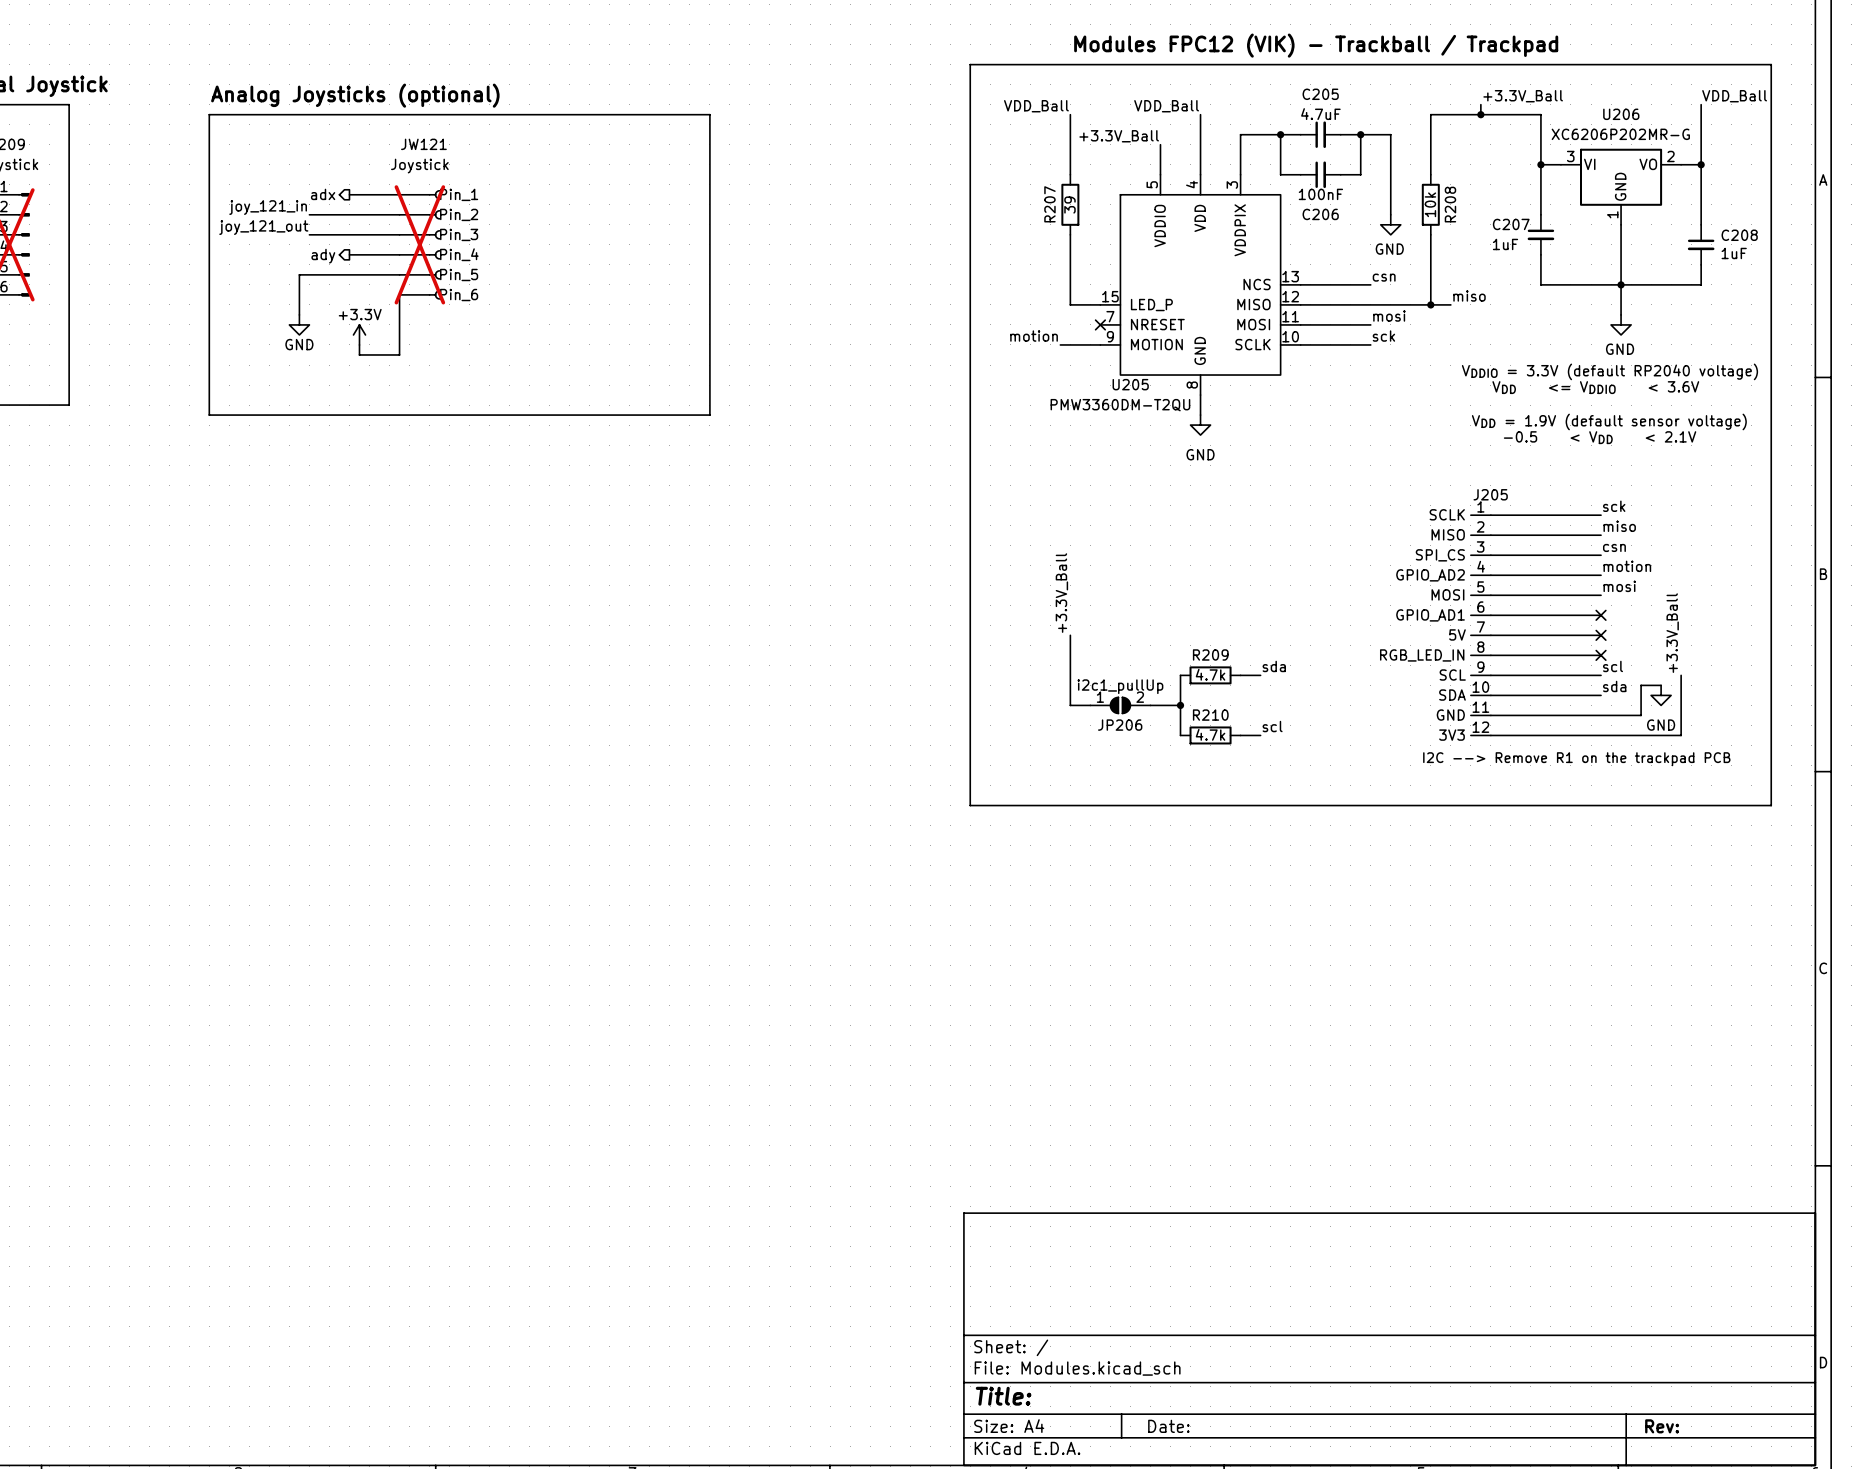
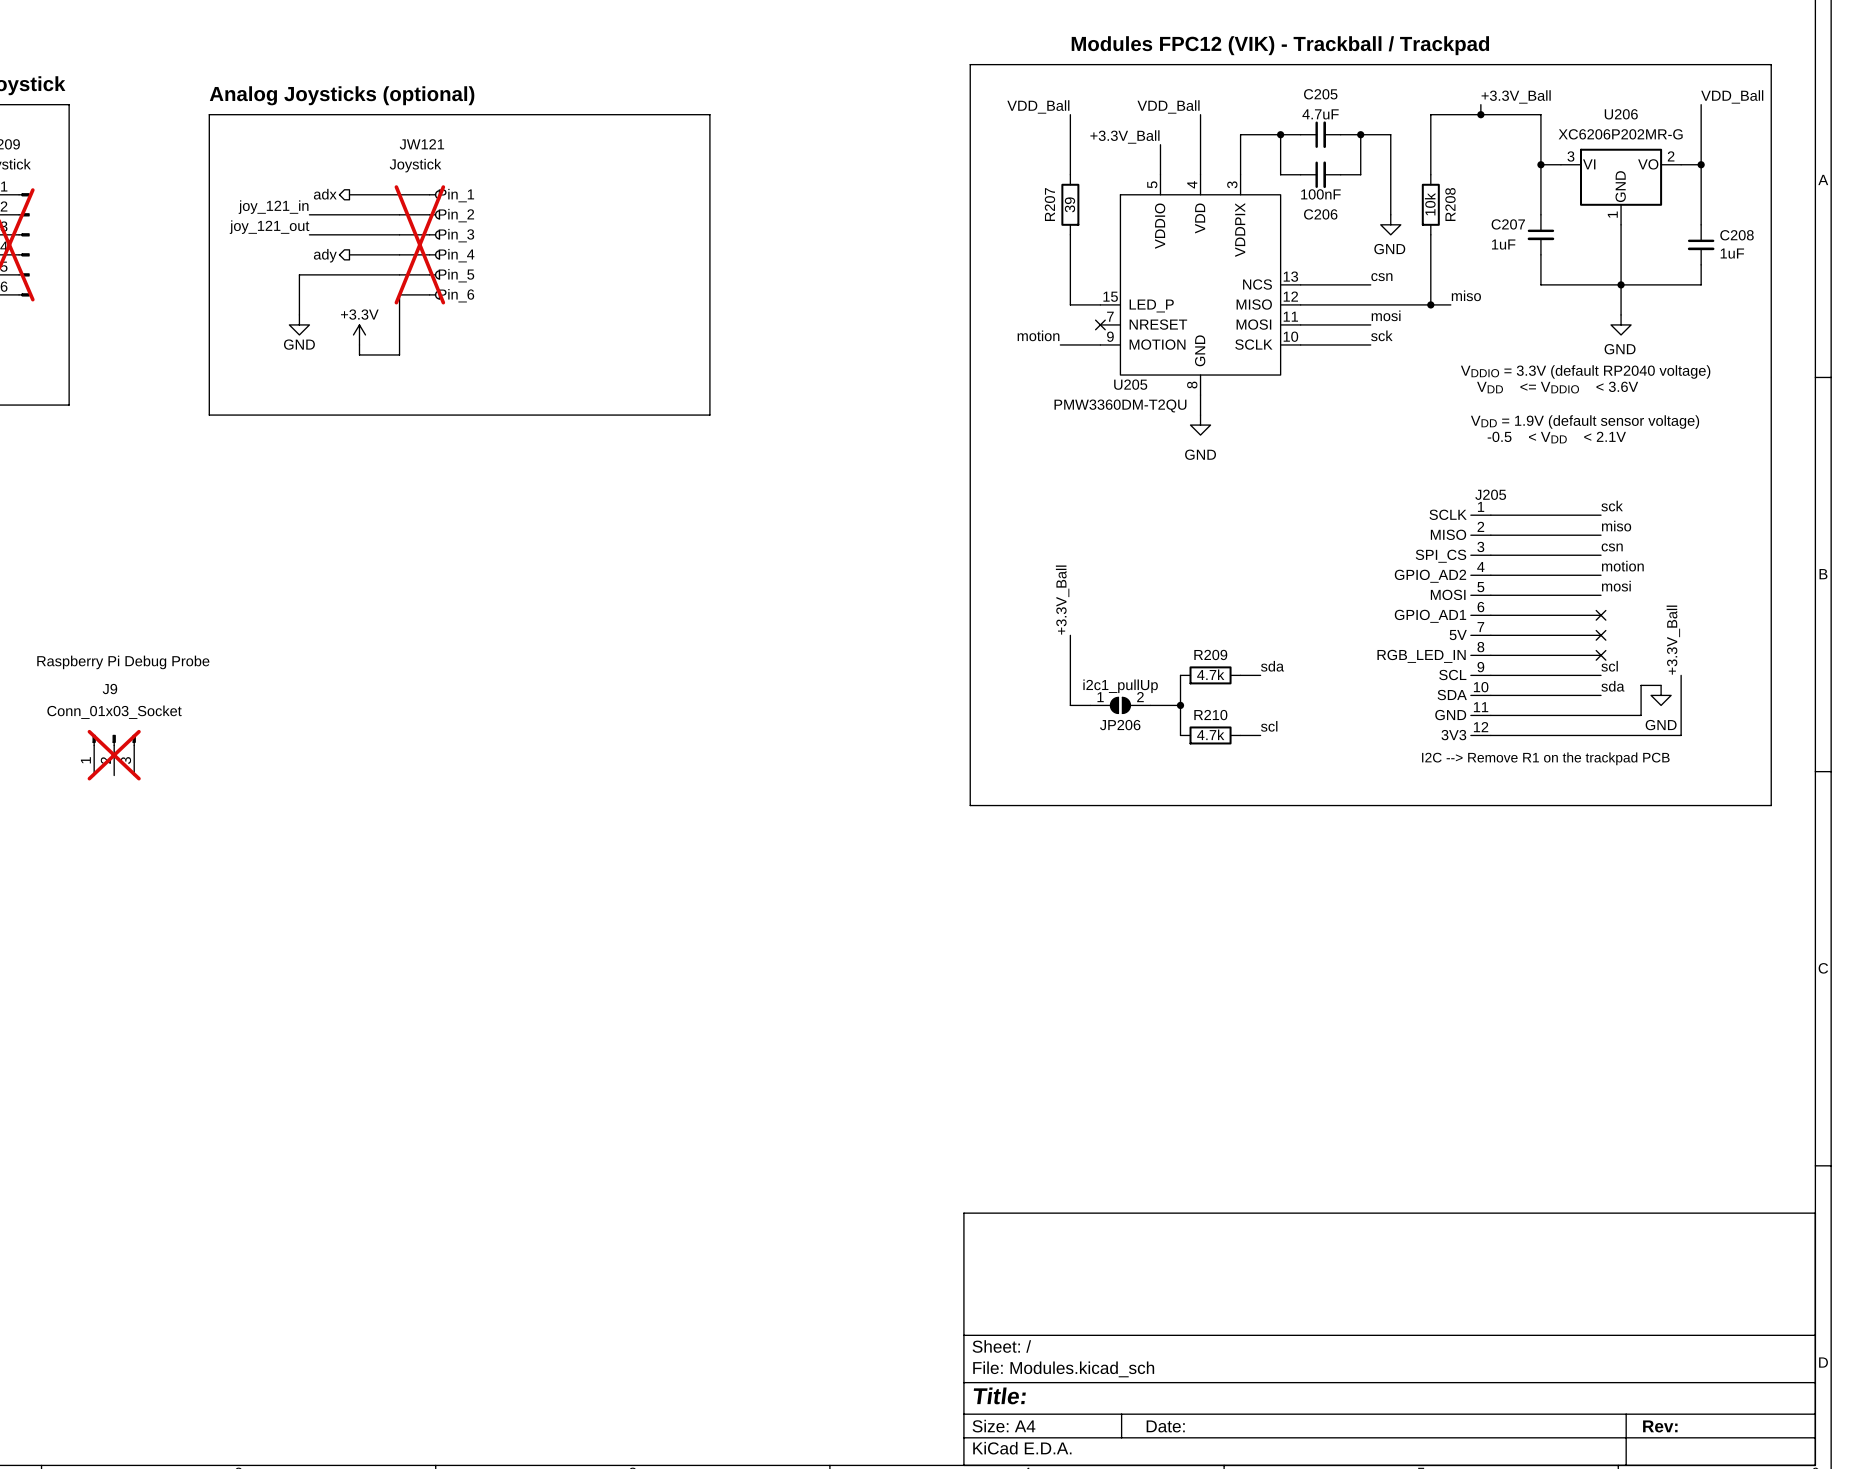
text: none -> Raspberry Pi Debug Probe (123, 662)
J9: none -> Conn_01x03_Socket (114, 755)

